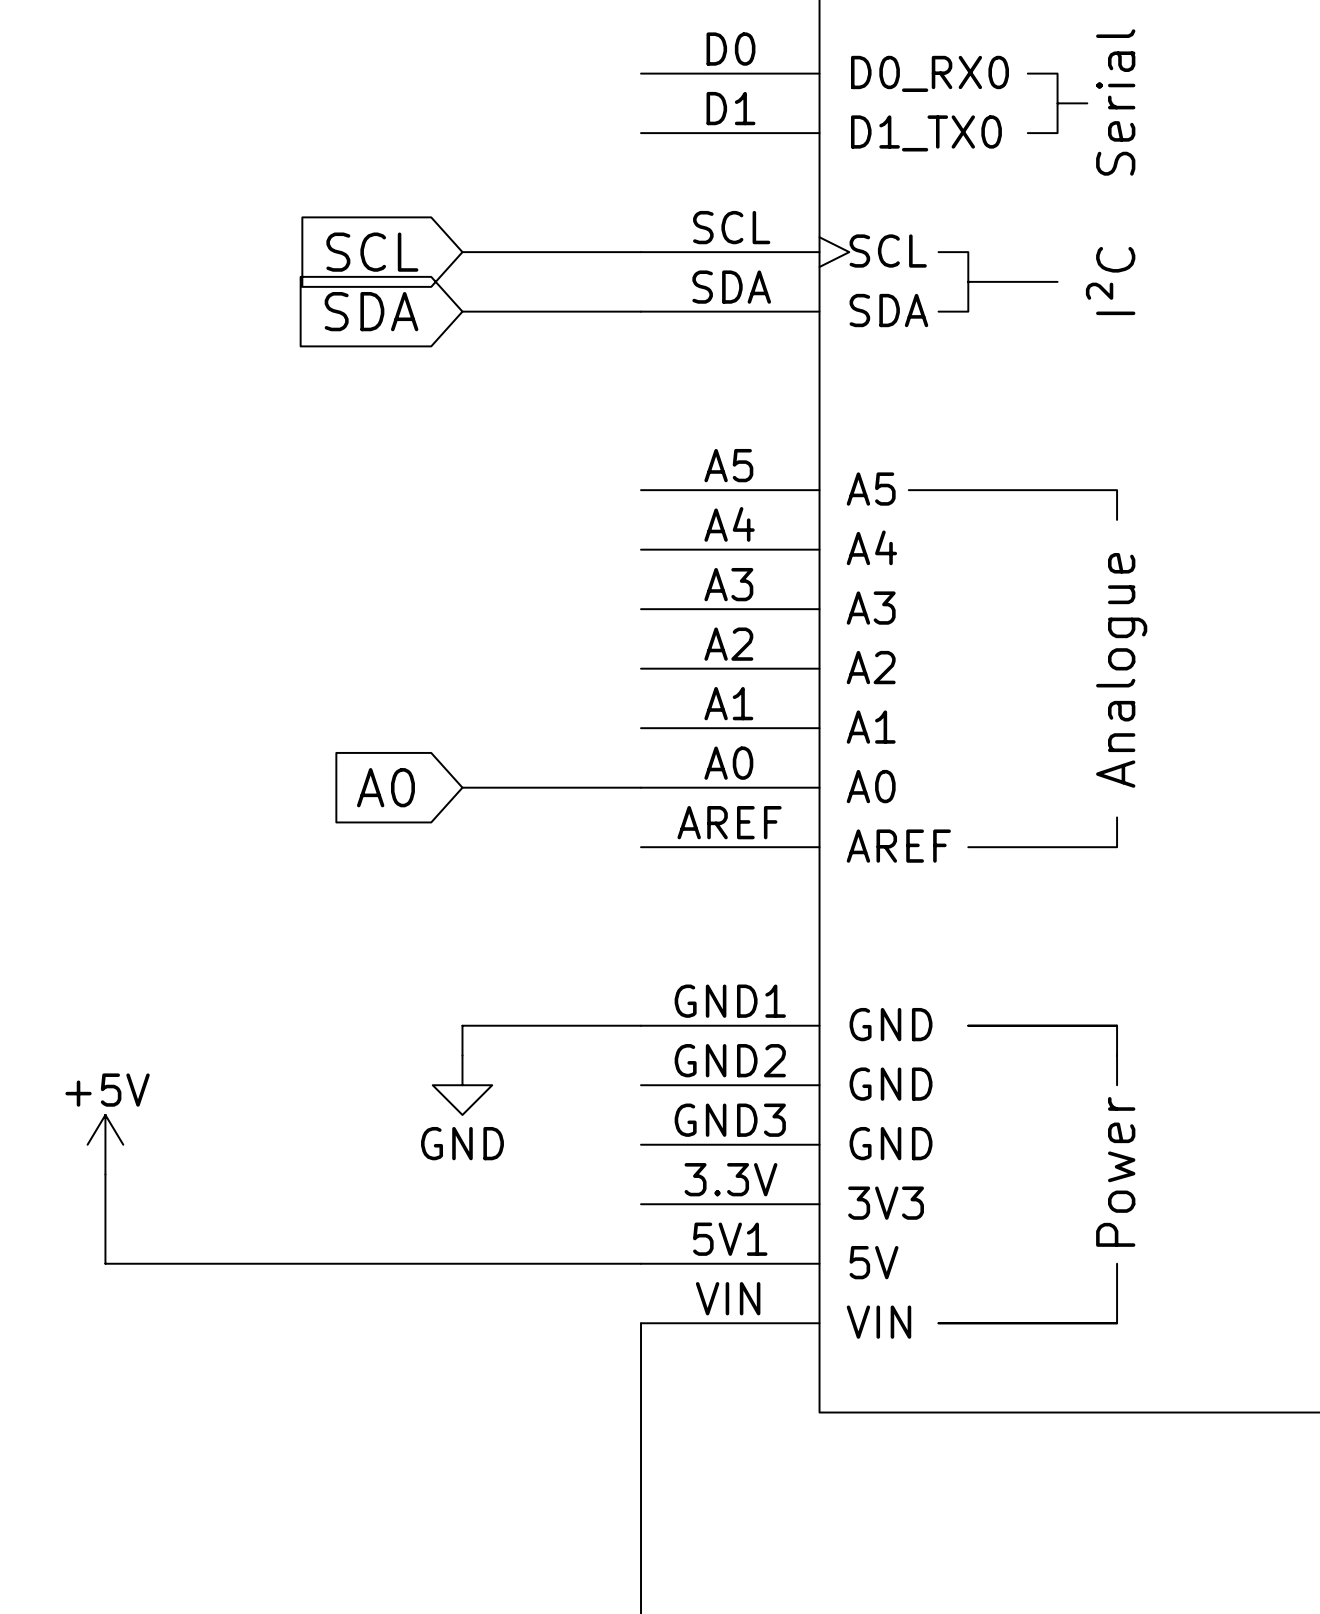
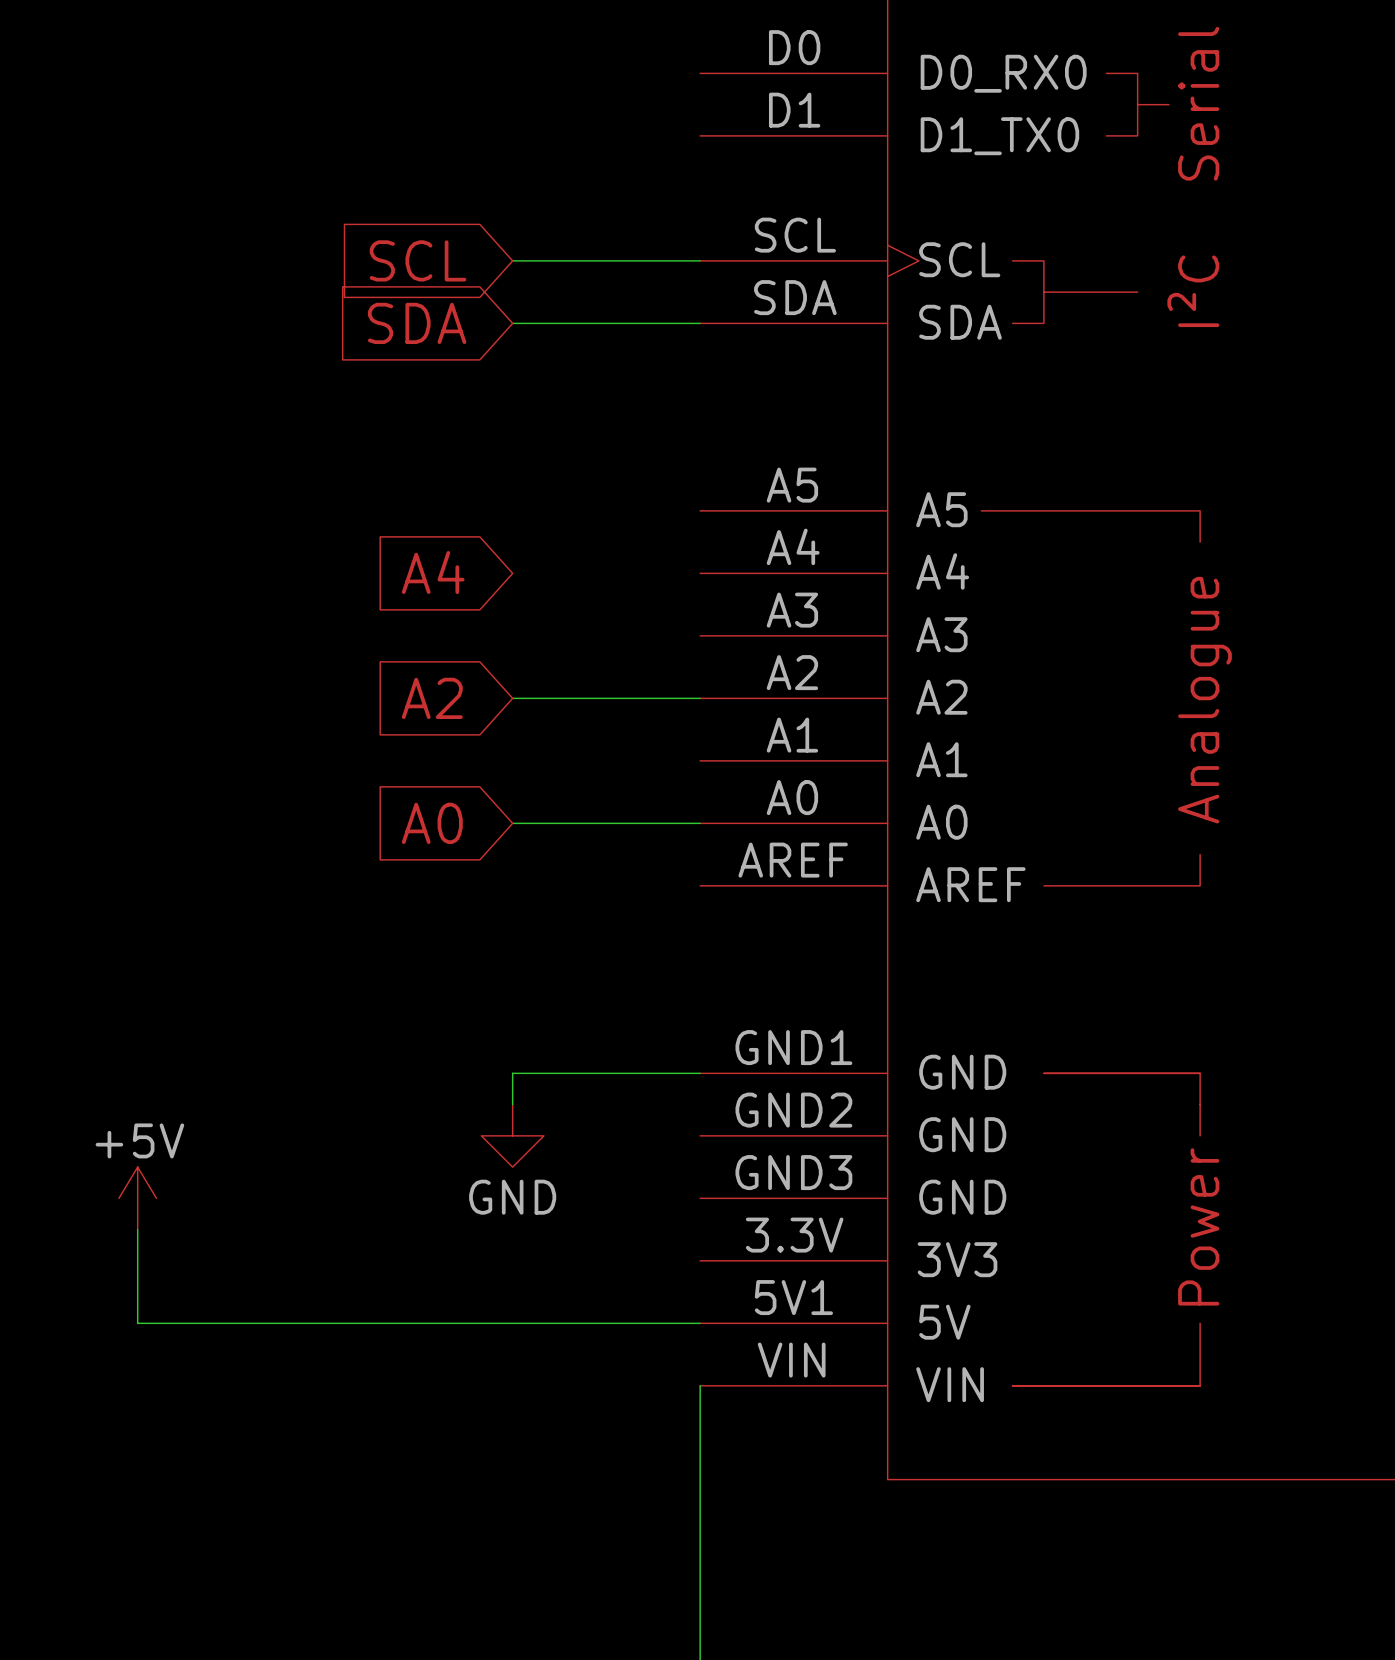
global label: none -> A4 (433, 572)
global label: none -> A2 (432, 698)
wire: none -> (512, 698) (700, 698)

